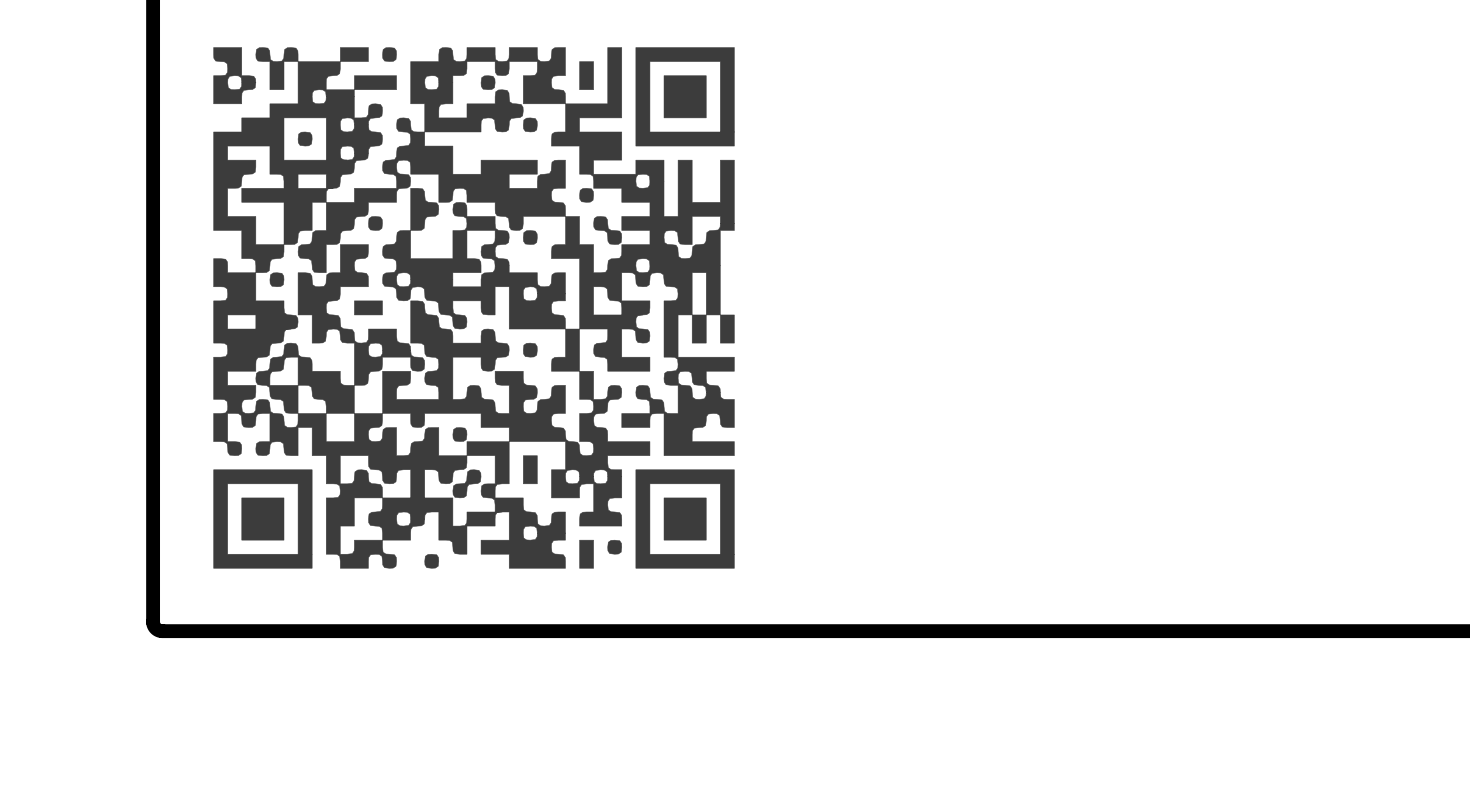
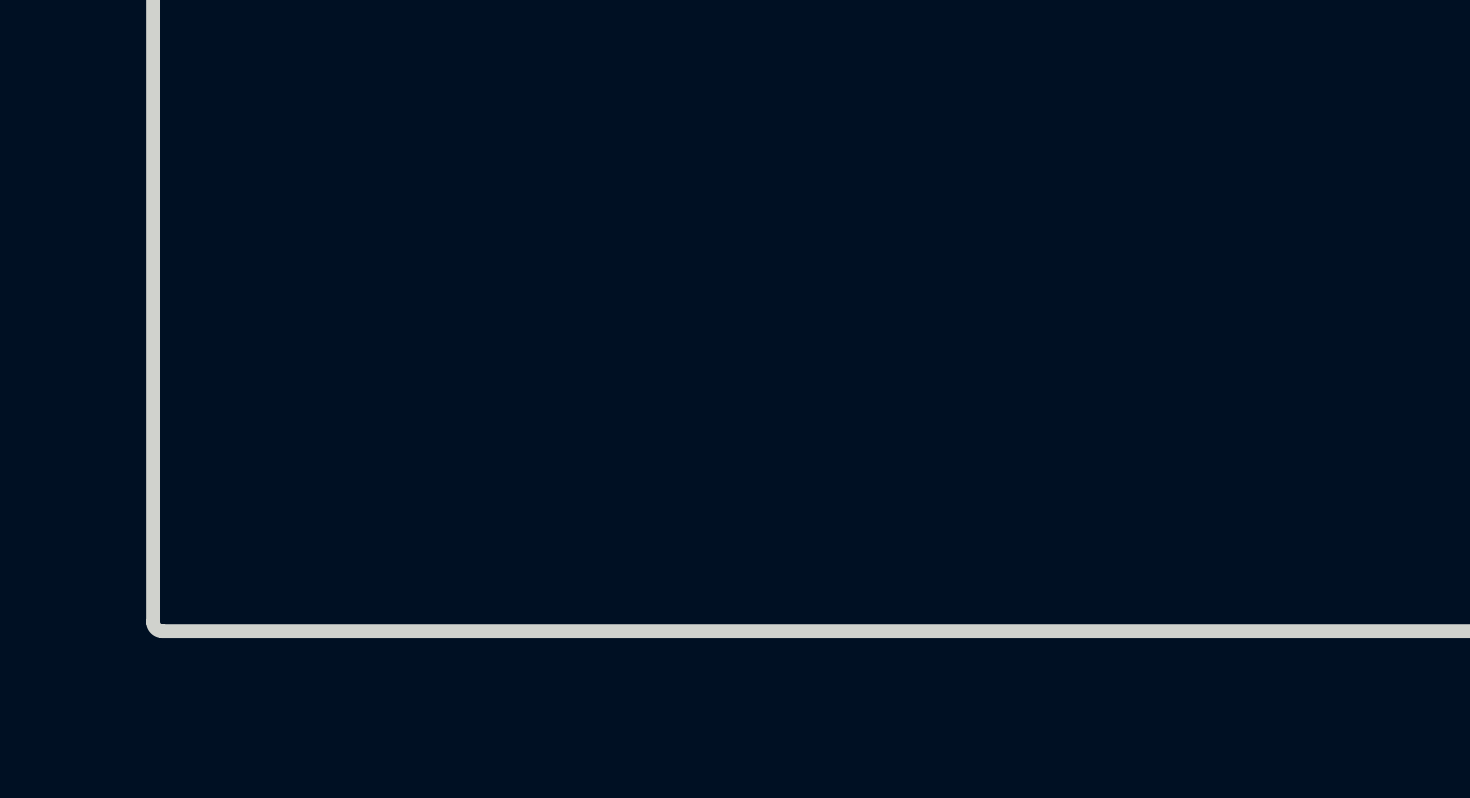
drawing: [213, 47, 735, 569] -> none

